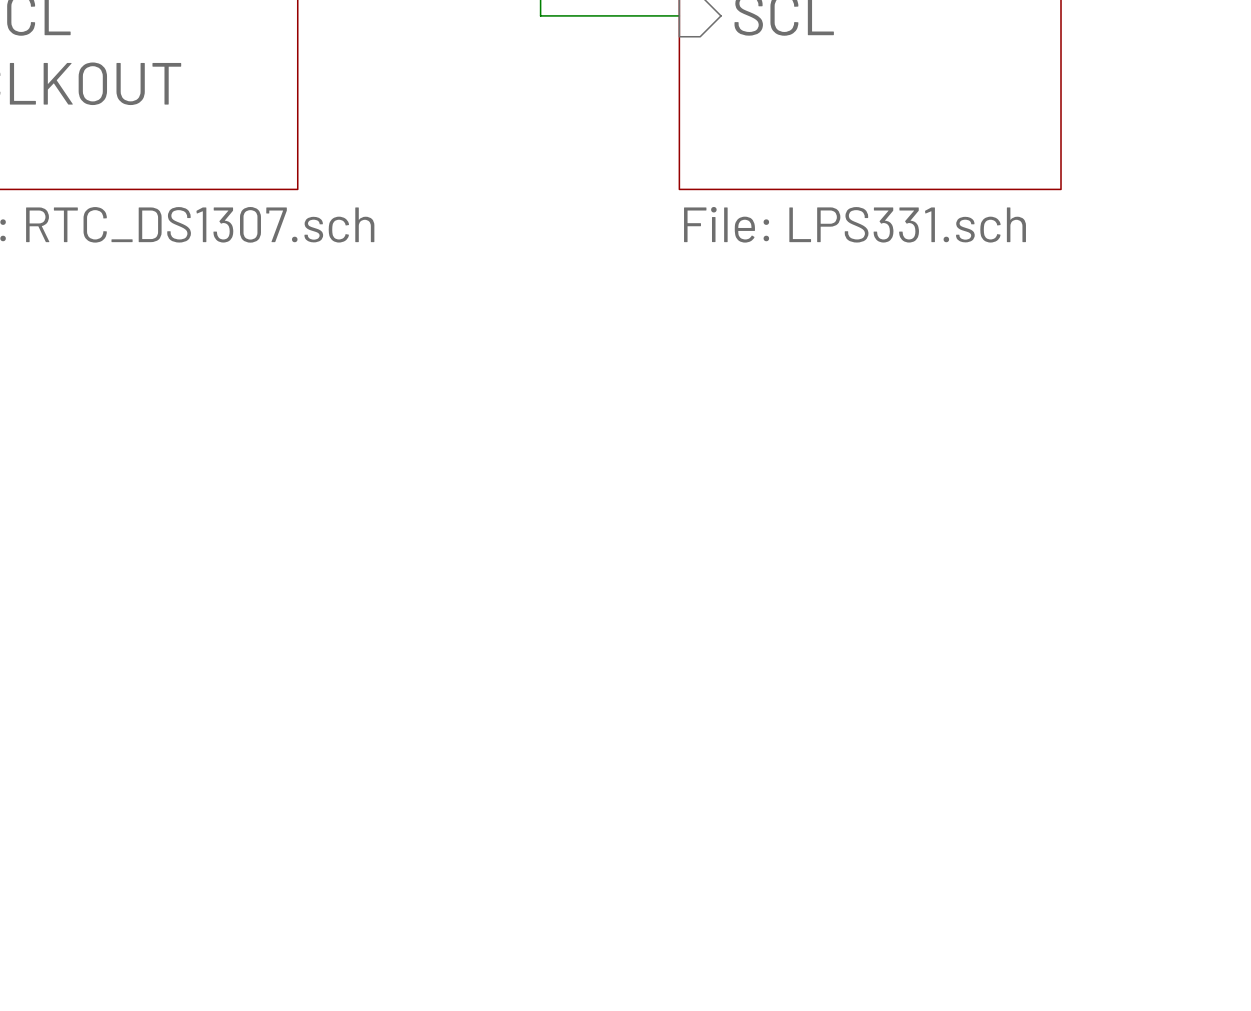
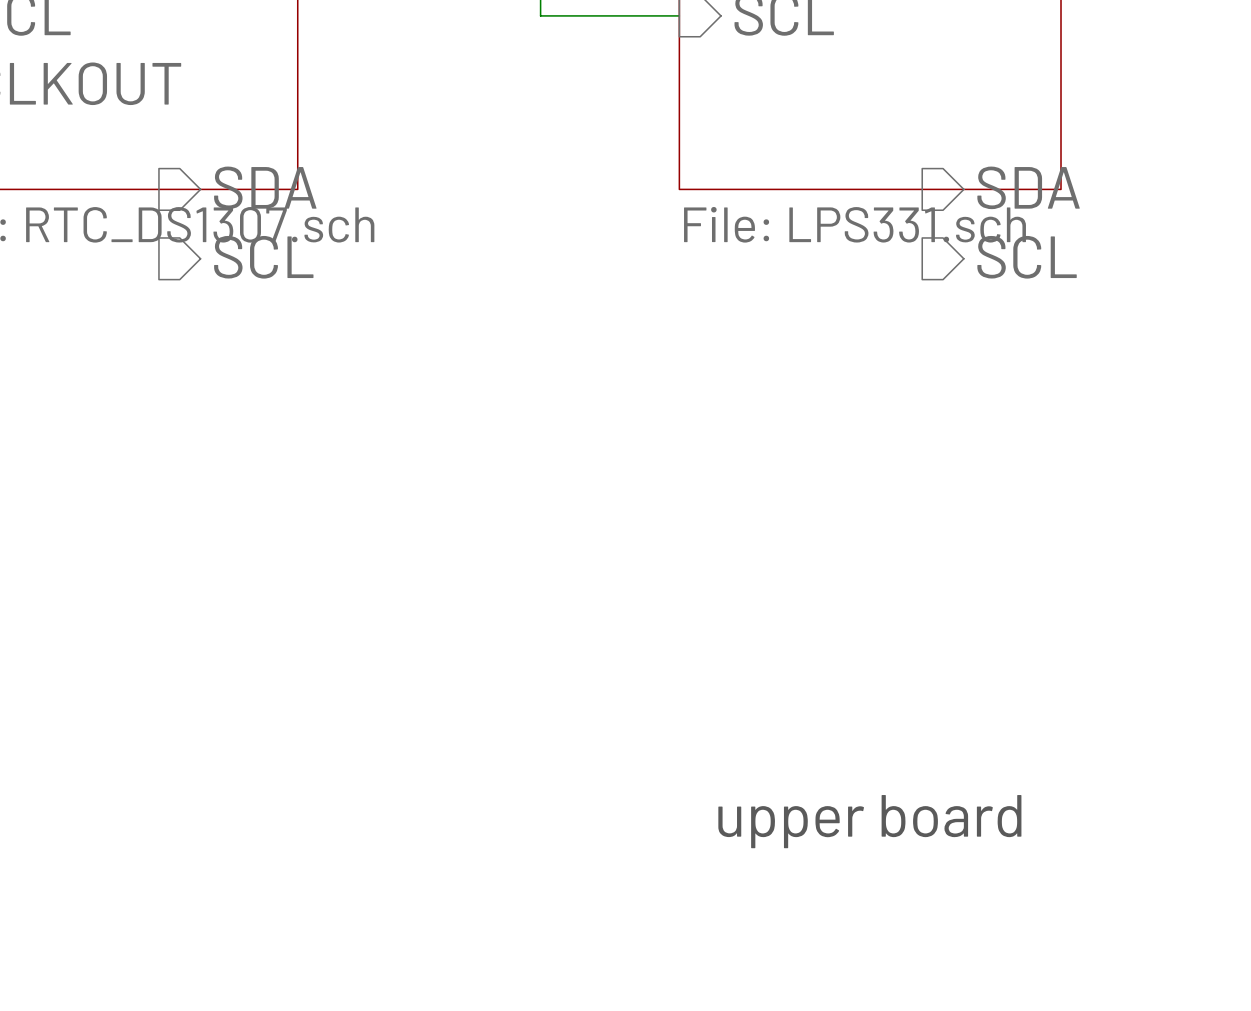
sheet pin: none -> SDA (265, 187)
sheet pin: none -> SDA (1028, 187)
sheet pin: none -> SCL (263, 257)
sheet pin: none -> SCL (1027, 257)
text: none -> upper board (869, 821)

